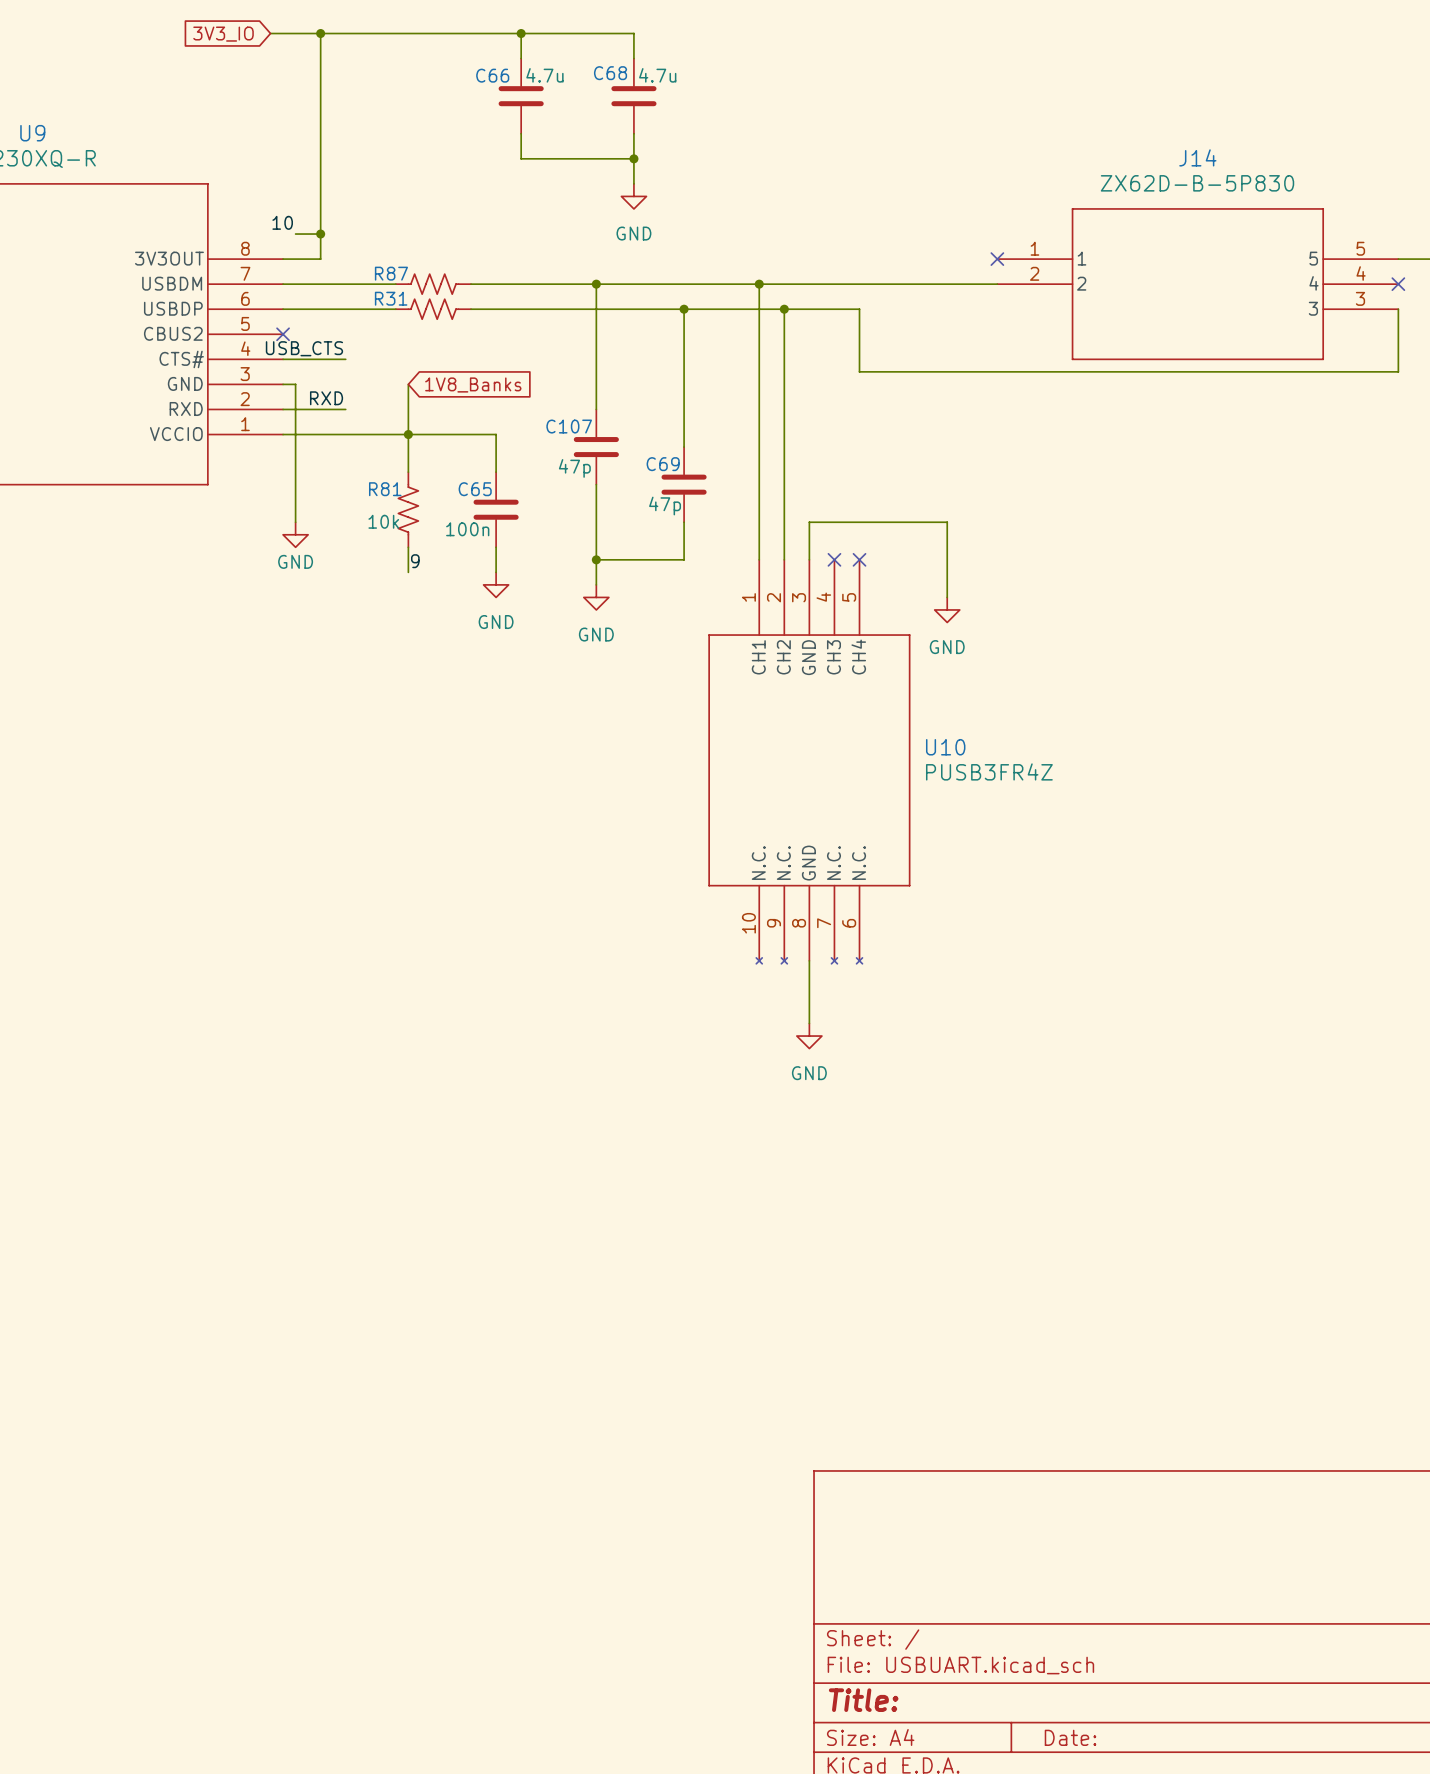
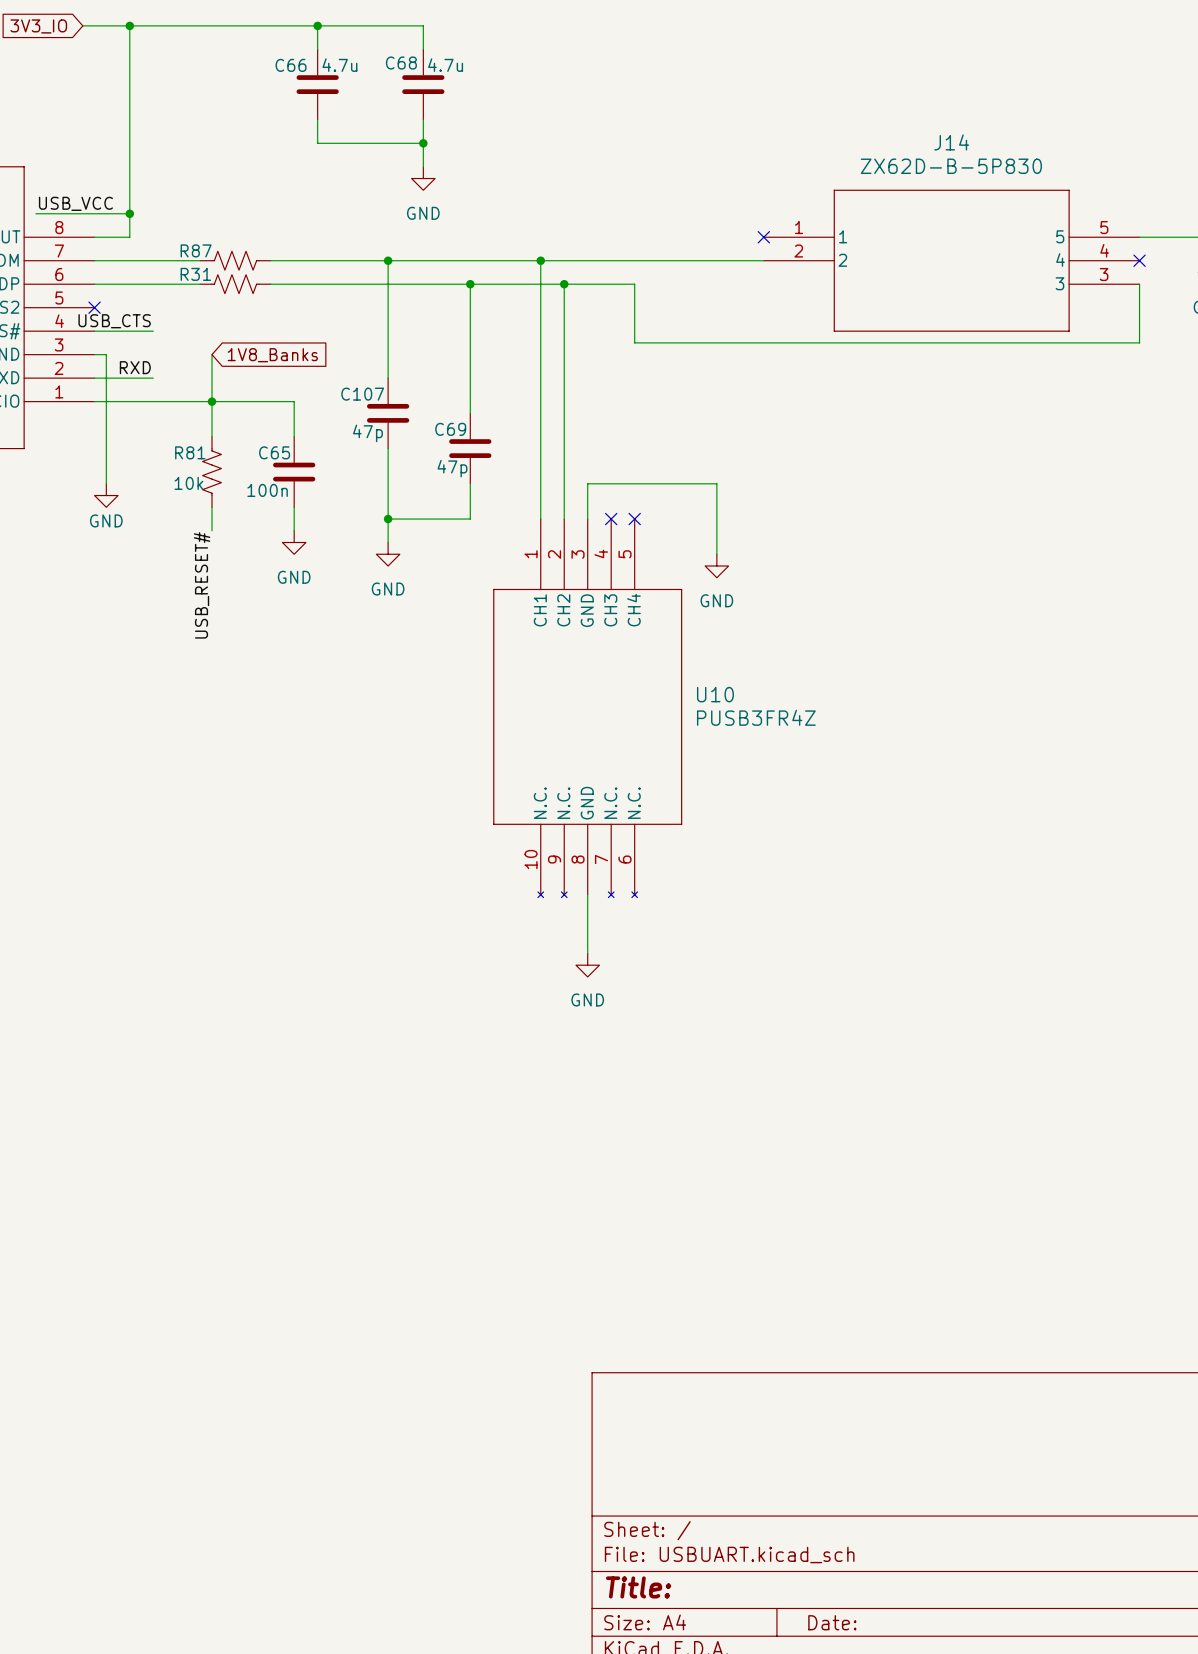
label: 10 (282, 222) -> none
label: none -> USB_VCC (75, 203)
wire: none -> (35, 213) (106, 213)
label: 9 (415, 561) -> USB_RESET# (202, 585)

